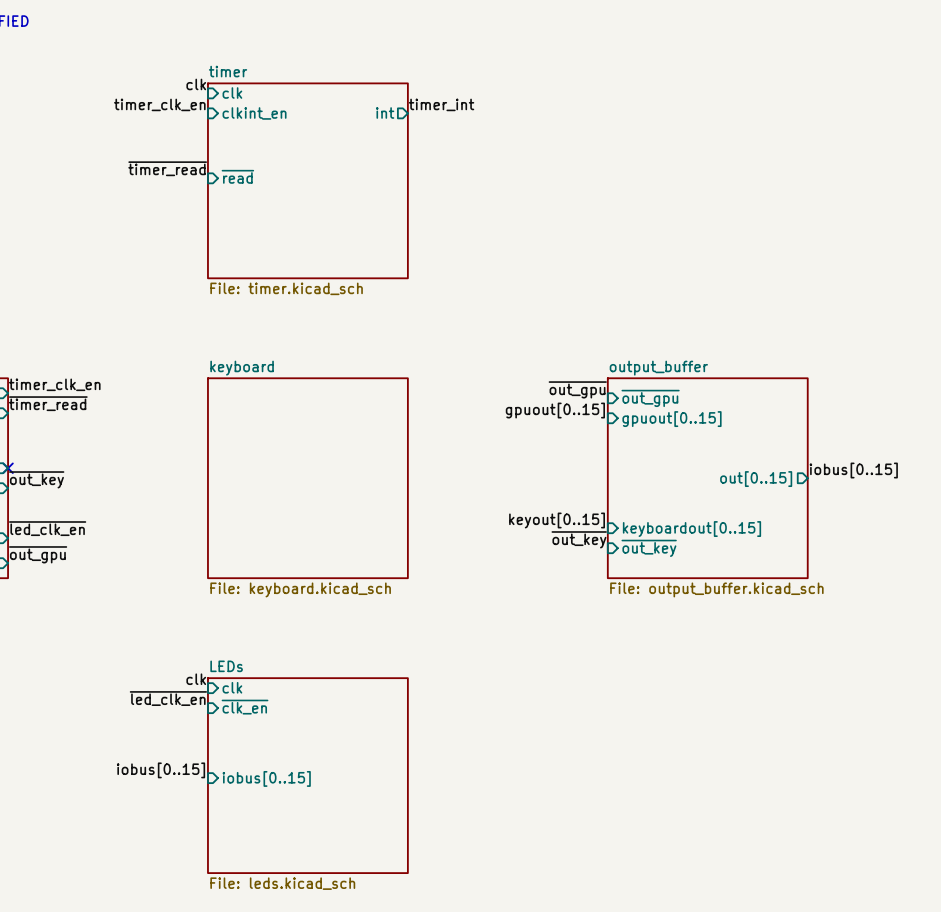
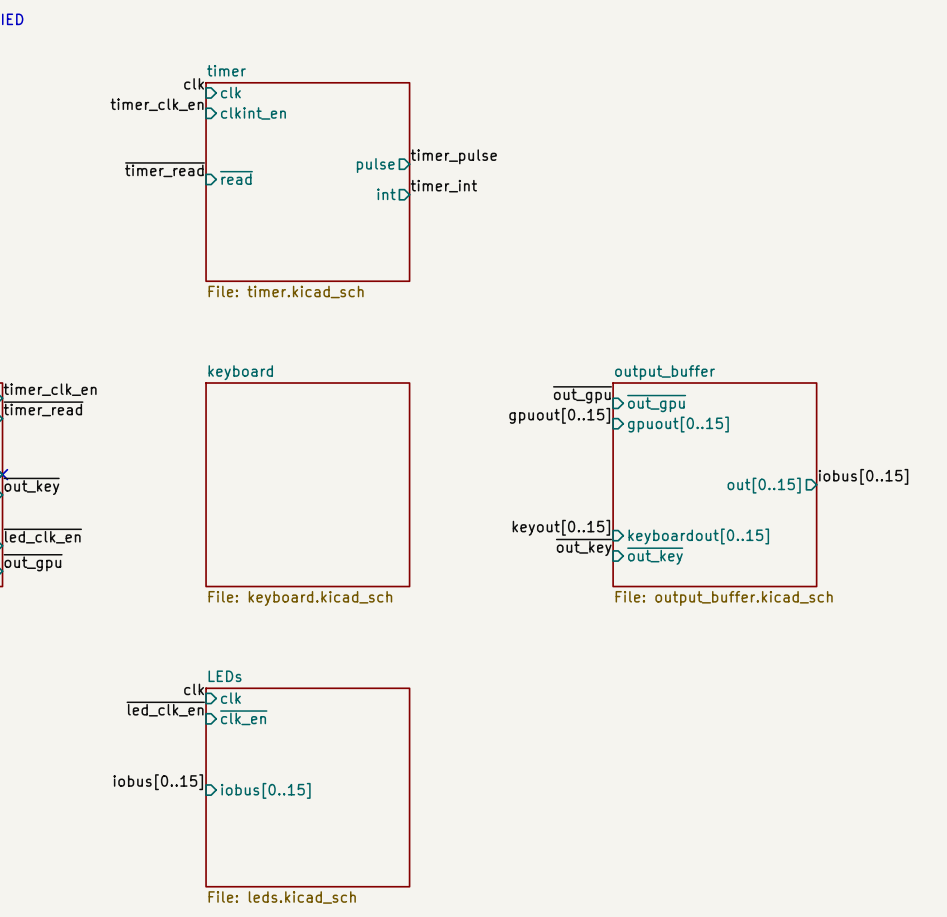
label position: timer_int (441, 104) -> timer_int (443, 186)
sheet pin position: int (385, 113) -> int (386, 194)
label: none -> timer_pulse (453, 156)
sheet pin: none -> pulse (375, 165)

